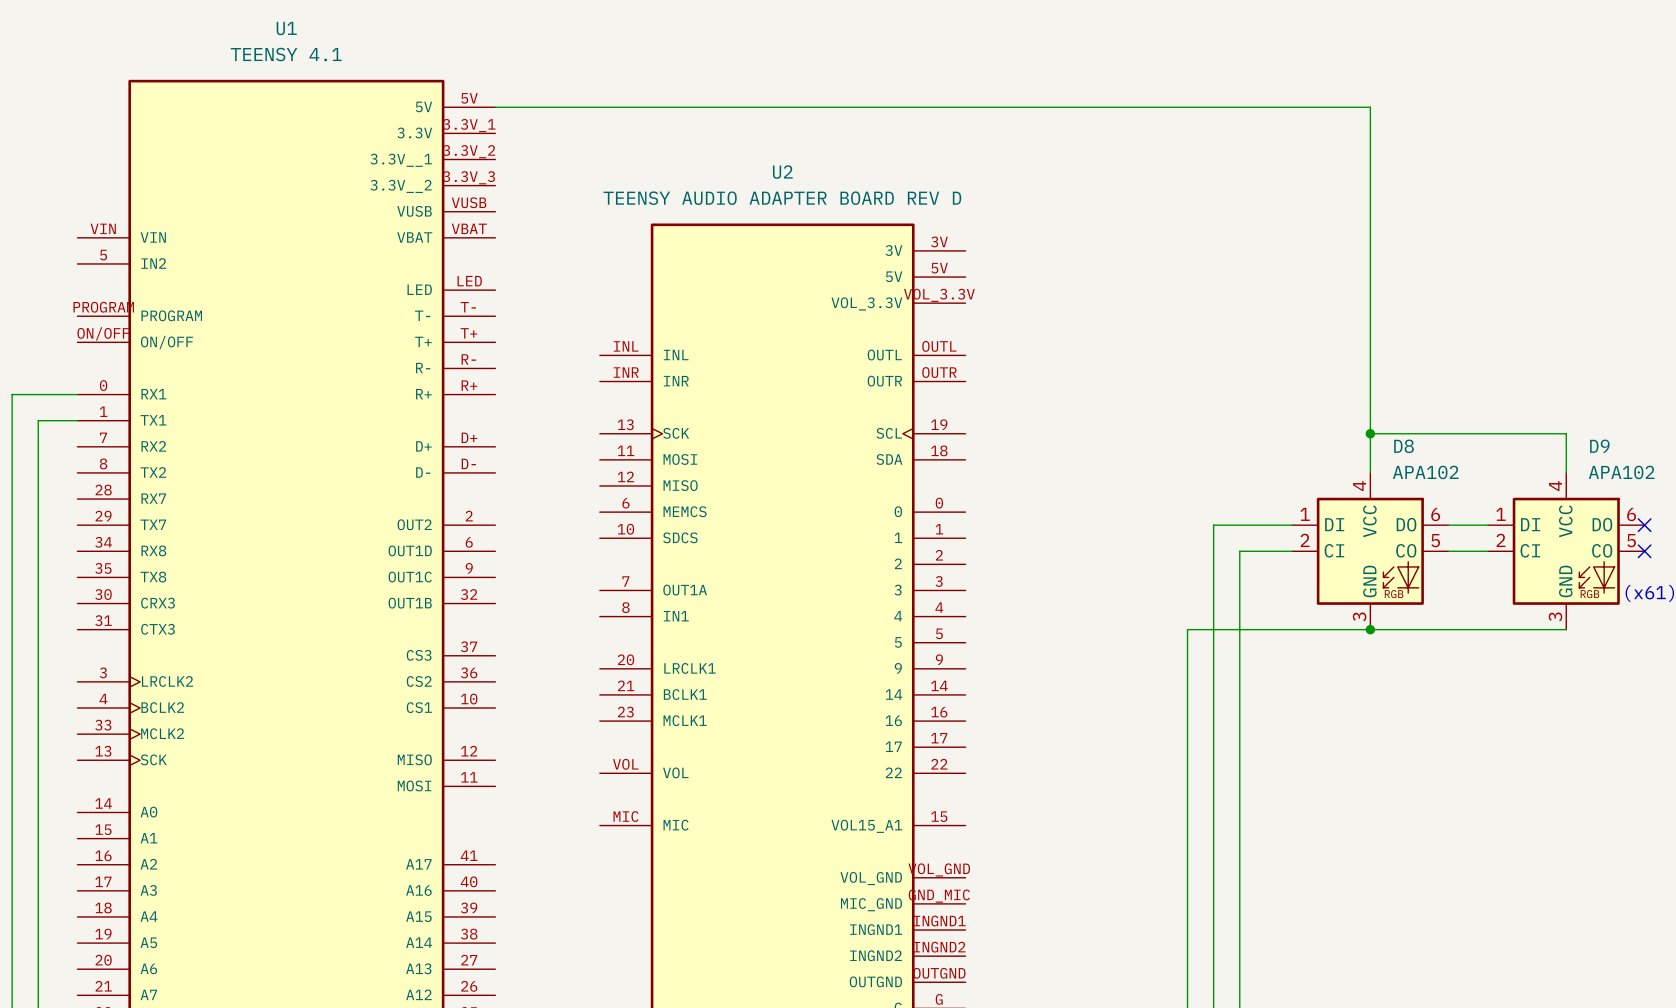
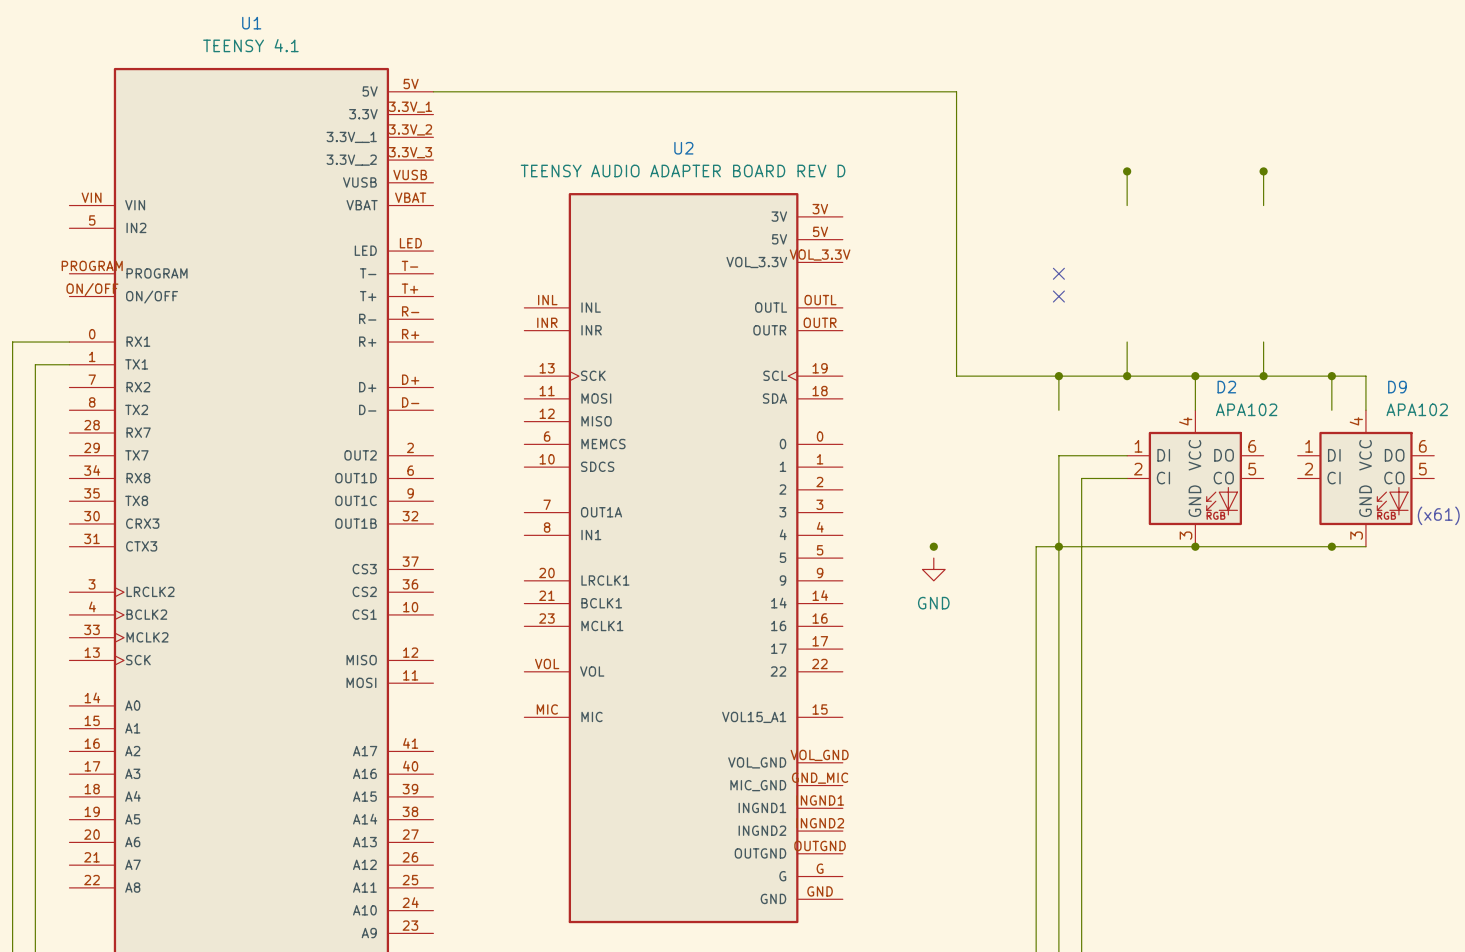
wire: (1096, 107) (1370, 107) (1370, 433) -> (956, 91) (956, 376) (1195, 376)
wire: none -> (1127, 171) (1127, 205)
junction: none -> (1127, 171)
wire: none -> (1263, 171) (1263, 205)
junction: none -> (1263, 171)
no-connect mark: none -> (1058, 273)
no-connect mark: none -> (1058, 296)
wire: none -> (1127, 342) (1127, 376)
wire: none -> (1263, 342) (1263, 376)
wire: none -> (1058, 376) (1058, 410)
junction: none -> (1058, 376)
junction: none -> (1127, 376)
junction: none -> (1263, 376)
wire: none -> (1331, 376) (1331, 410)
junction: none -> (1331, 376)
D8 name: D8 (1404, 446) -> D2 (1226, 387)
wire: (1448, 525) (1487, 525) -> none
no-connect mark: (1644, 525) -> none
wire: (1448, 551) (1487, 551) -> none
no-connect mark: (1644, 551) -> none
junction: none -> (933, 546)
junction: none -> (1058, 546)
junction: none -> (1331, 546)
power symbol: none -> GND (933, 569)

